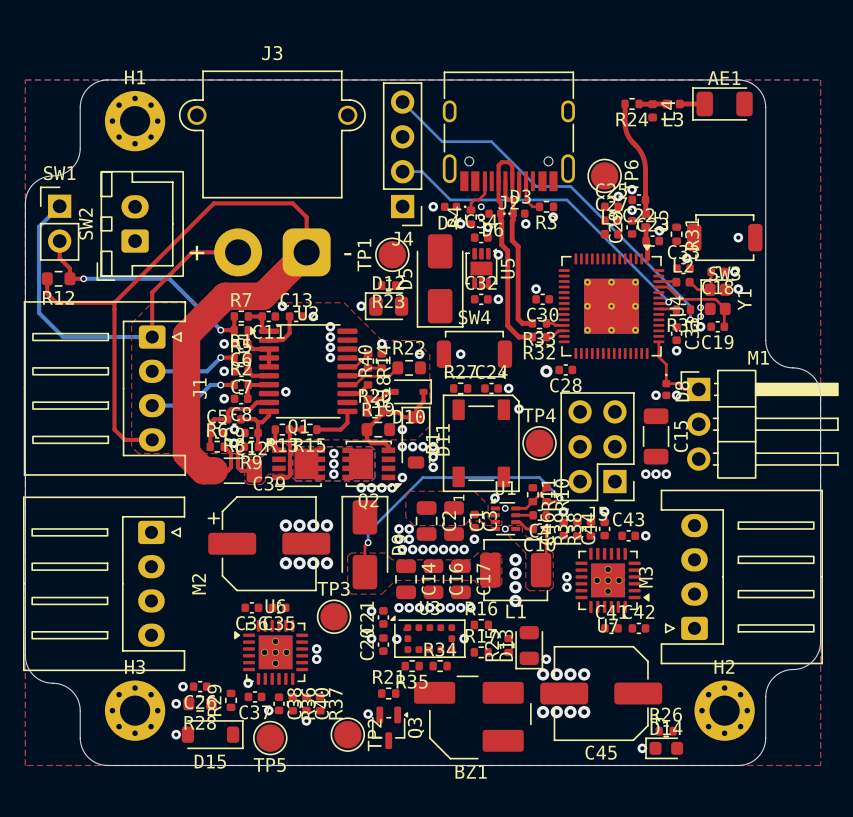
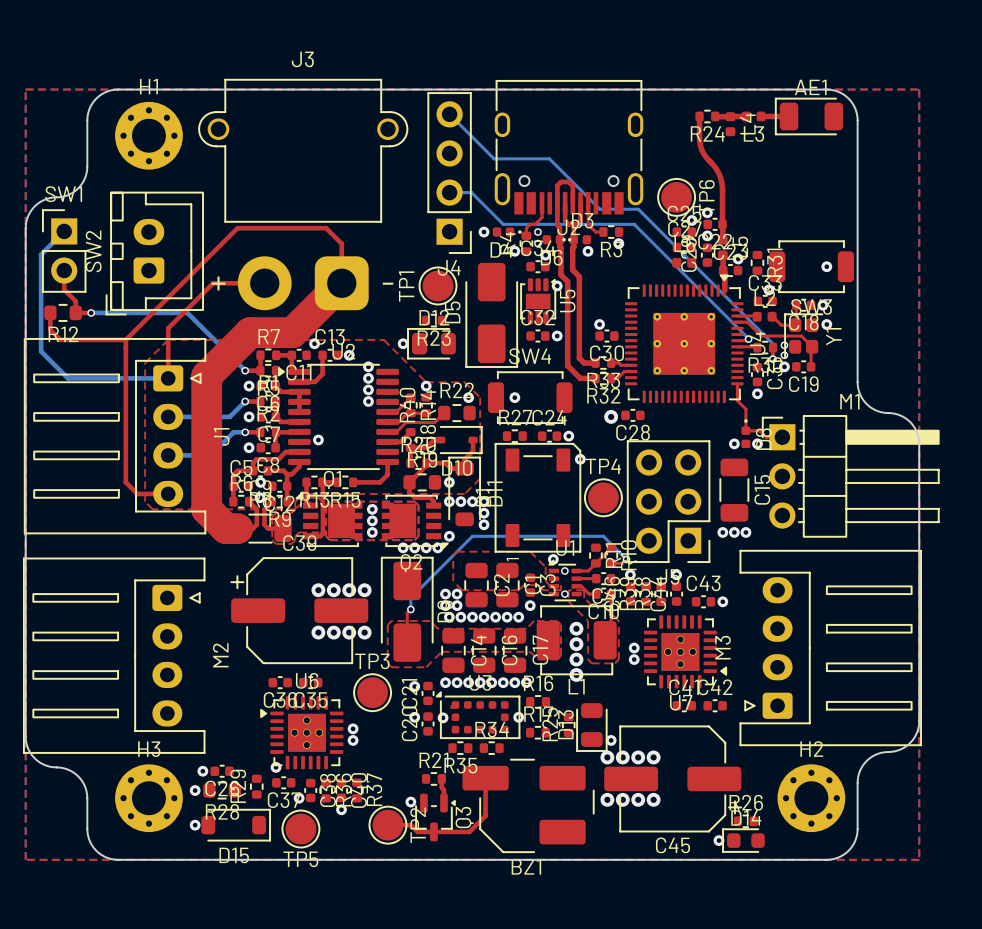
top track: none -> (485, 778) (485, 815) (469, 831) (417, 831) (410, 825) (387, 825)
top track: none -> (441, 778) (443, 803)

